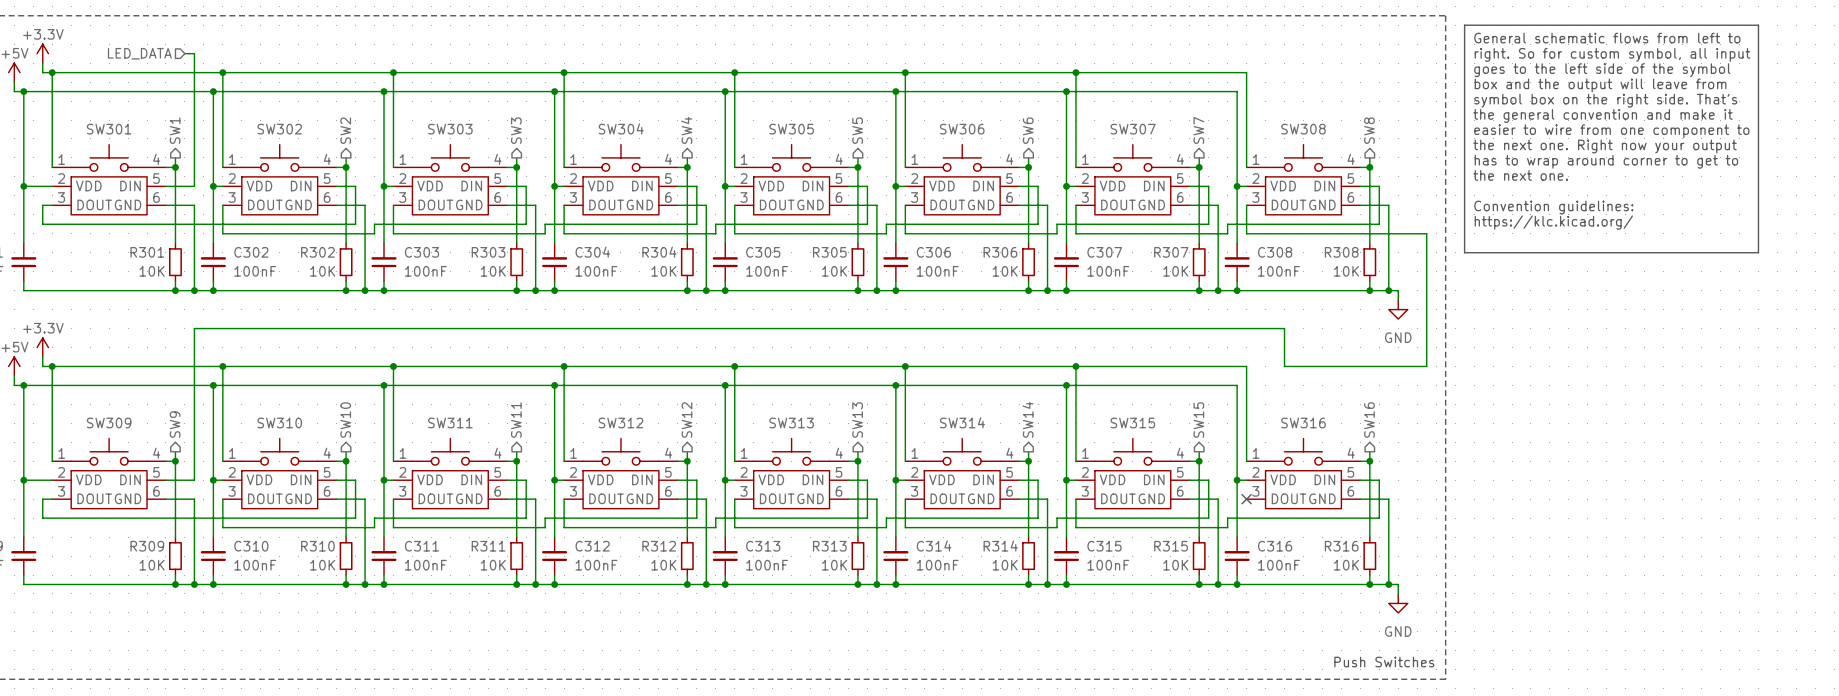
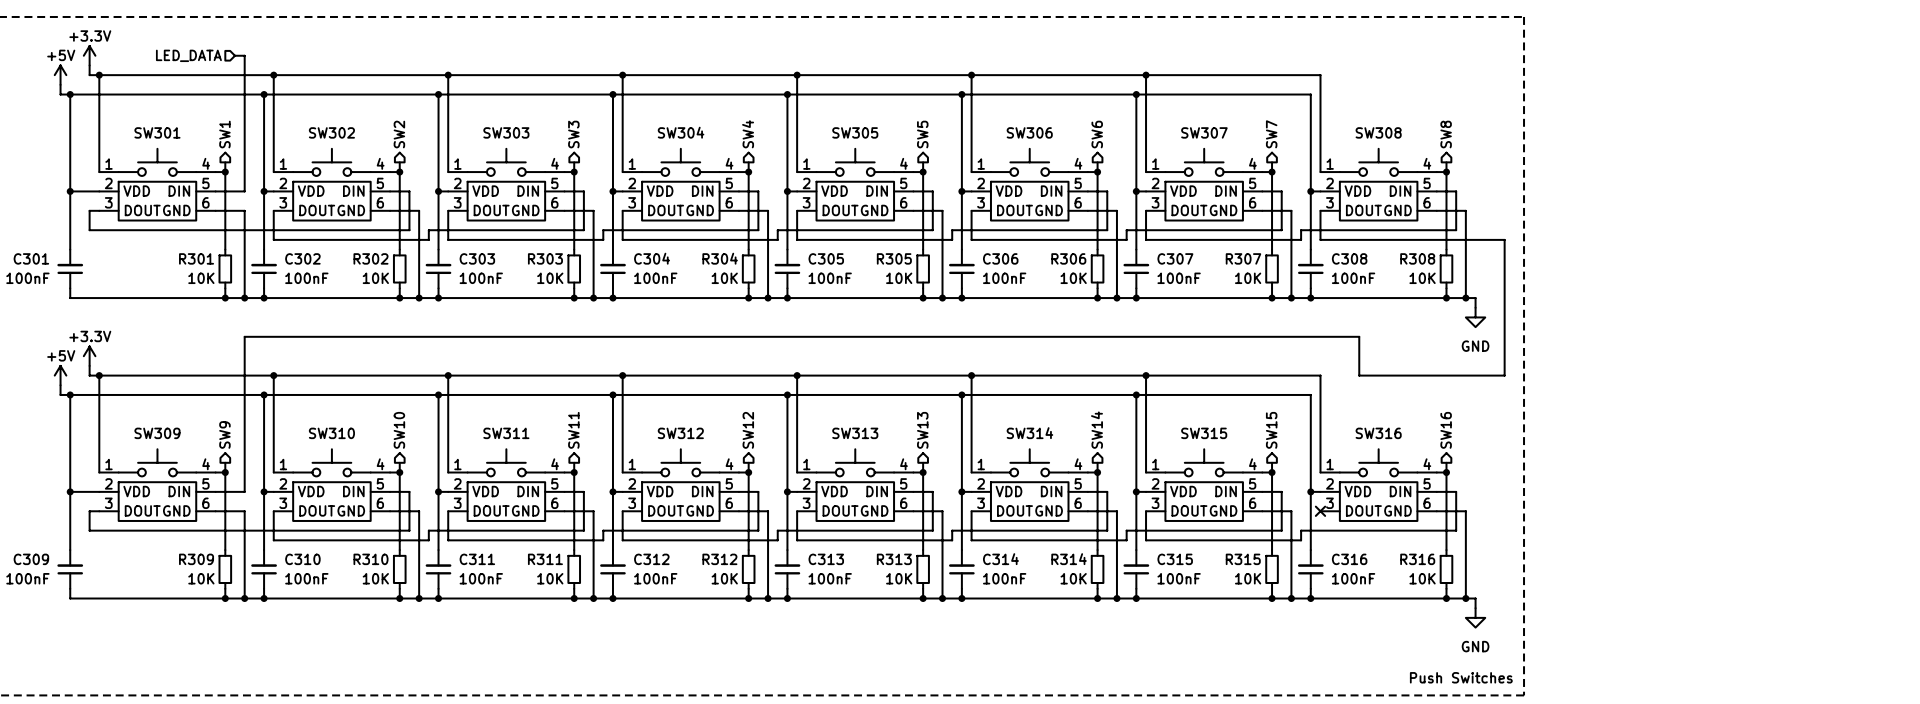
line: (1464, 25) (1758, 25) (1758, 252) (1464, 252) (1464, 25) -> none
text: General schematic flows from left to (1607, 38) -> none
text: right. So for custom symbol, all input (1612, 54) -> none
text: goes to the left side of the symbol (1602, 70) -> none
text: box and the output will leave from (1600, 85) -> none
text: symbol box on the right side. That's (1605, 100) -> none
text: the general convention and make it (1603, 115) -> none
text: easier to wire from one component to (1611, 131) -> none
text: the next one. Right now your output (1605, 146) -> none
text: has to wrap around corner to get to (1606, 161) -> none
text: the next one. (1520, 175) -> none
text: Convention guidelines: (1553, 207) -> none
text: https://klc.kicad.org/ (1553, 222) -> none

